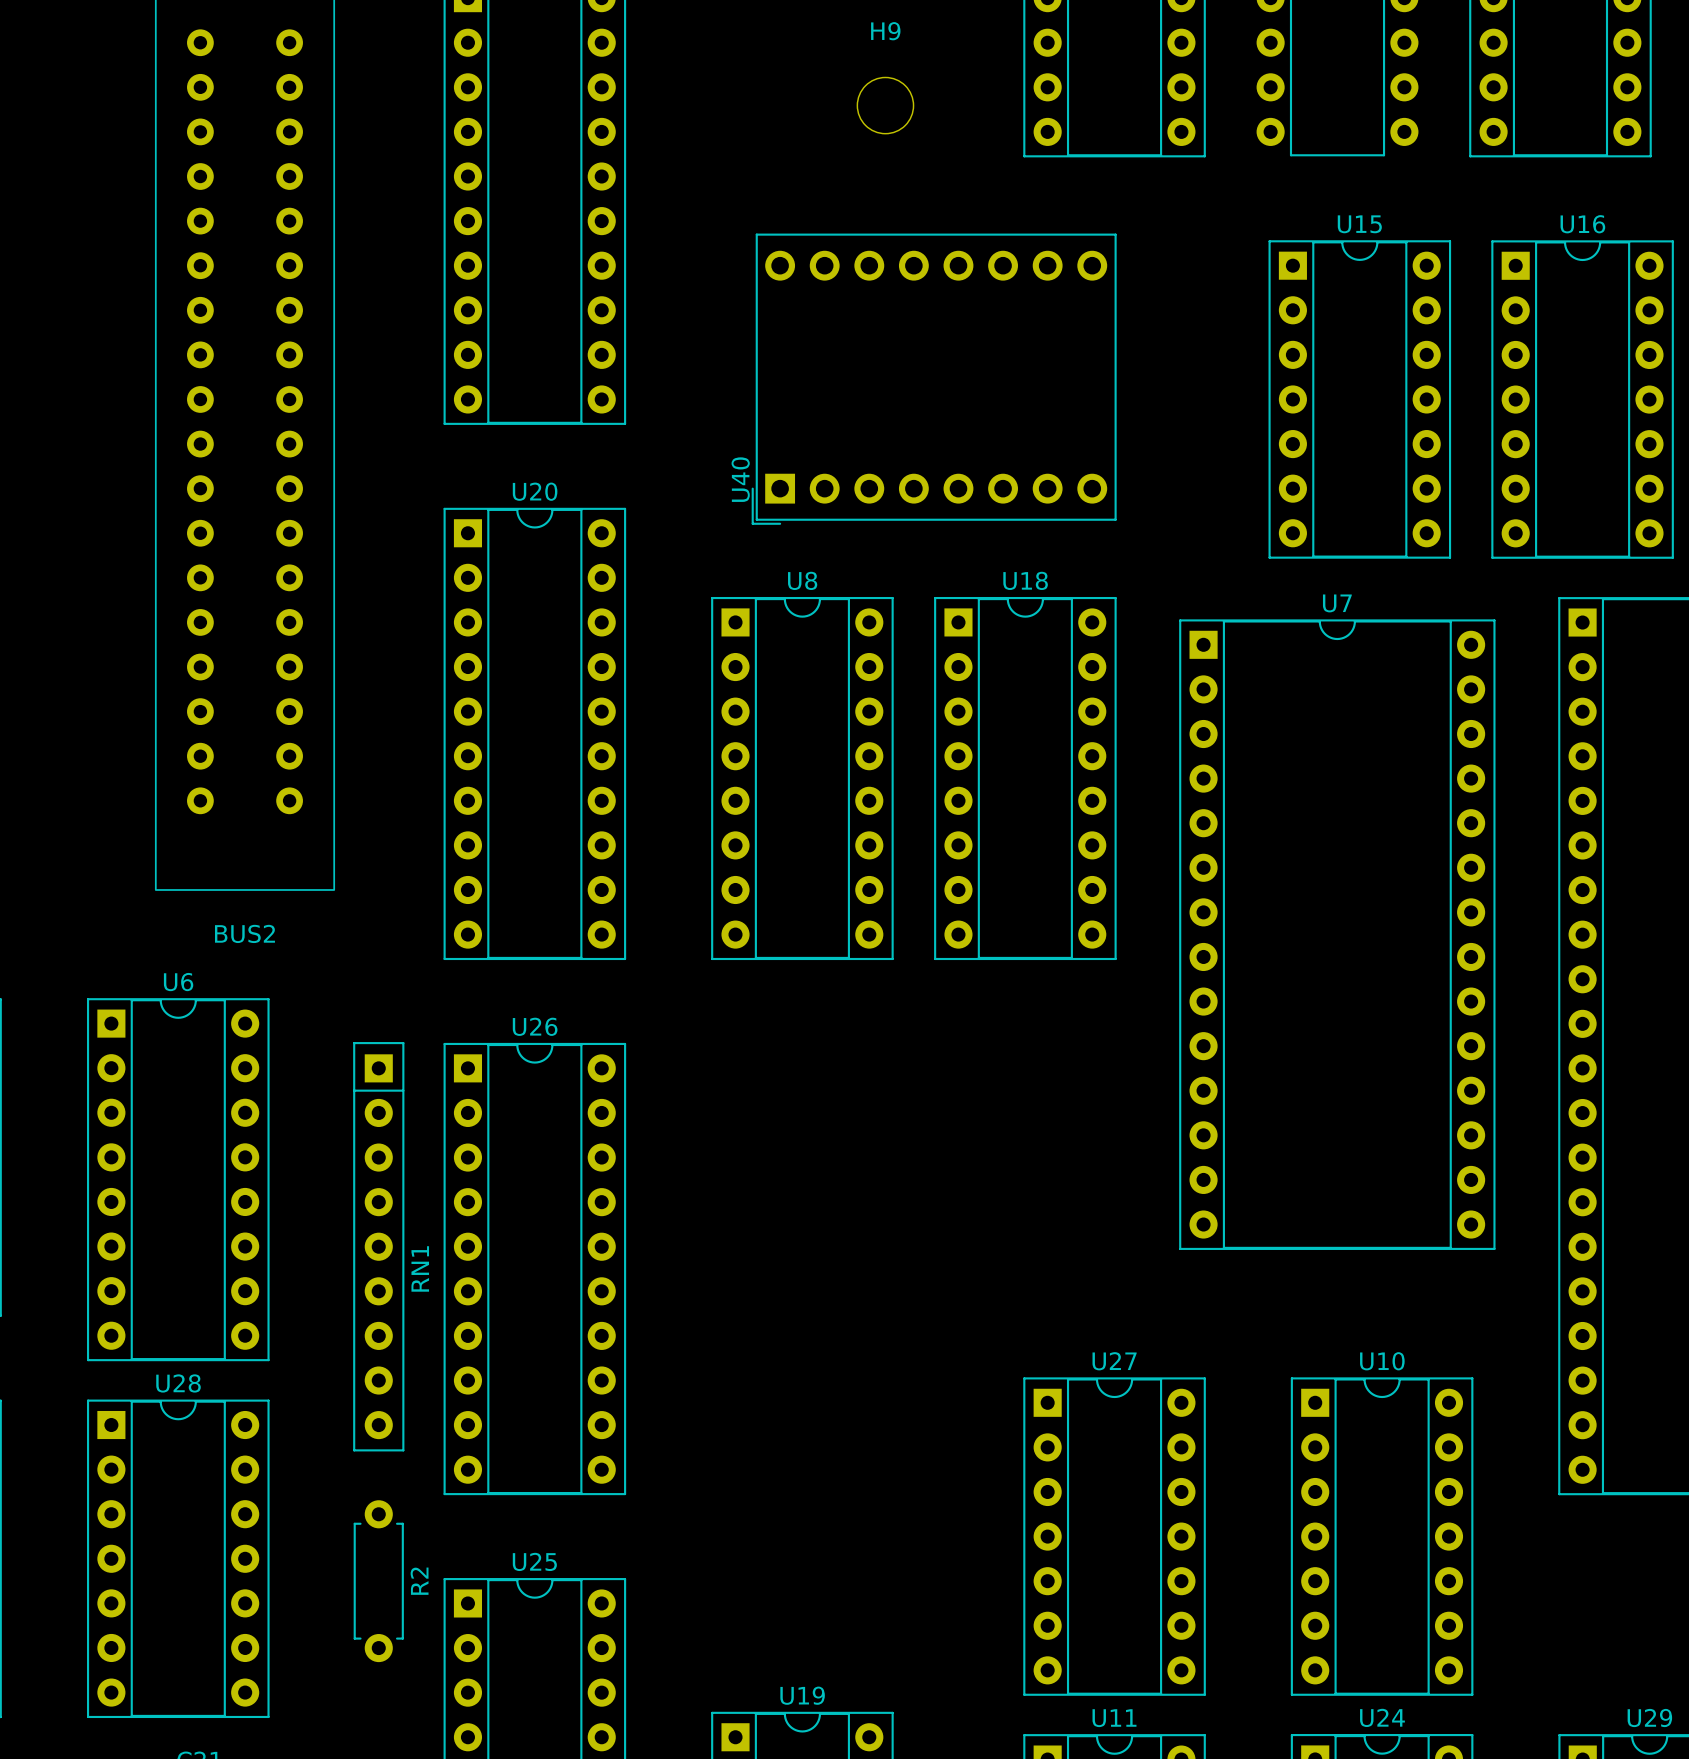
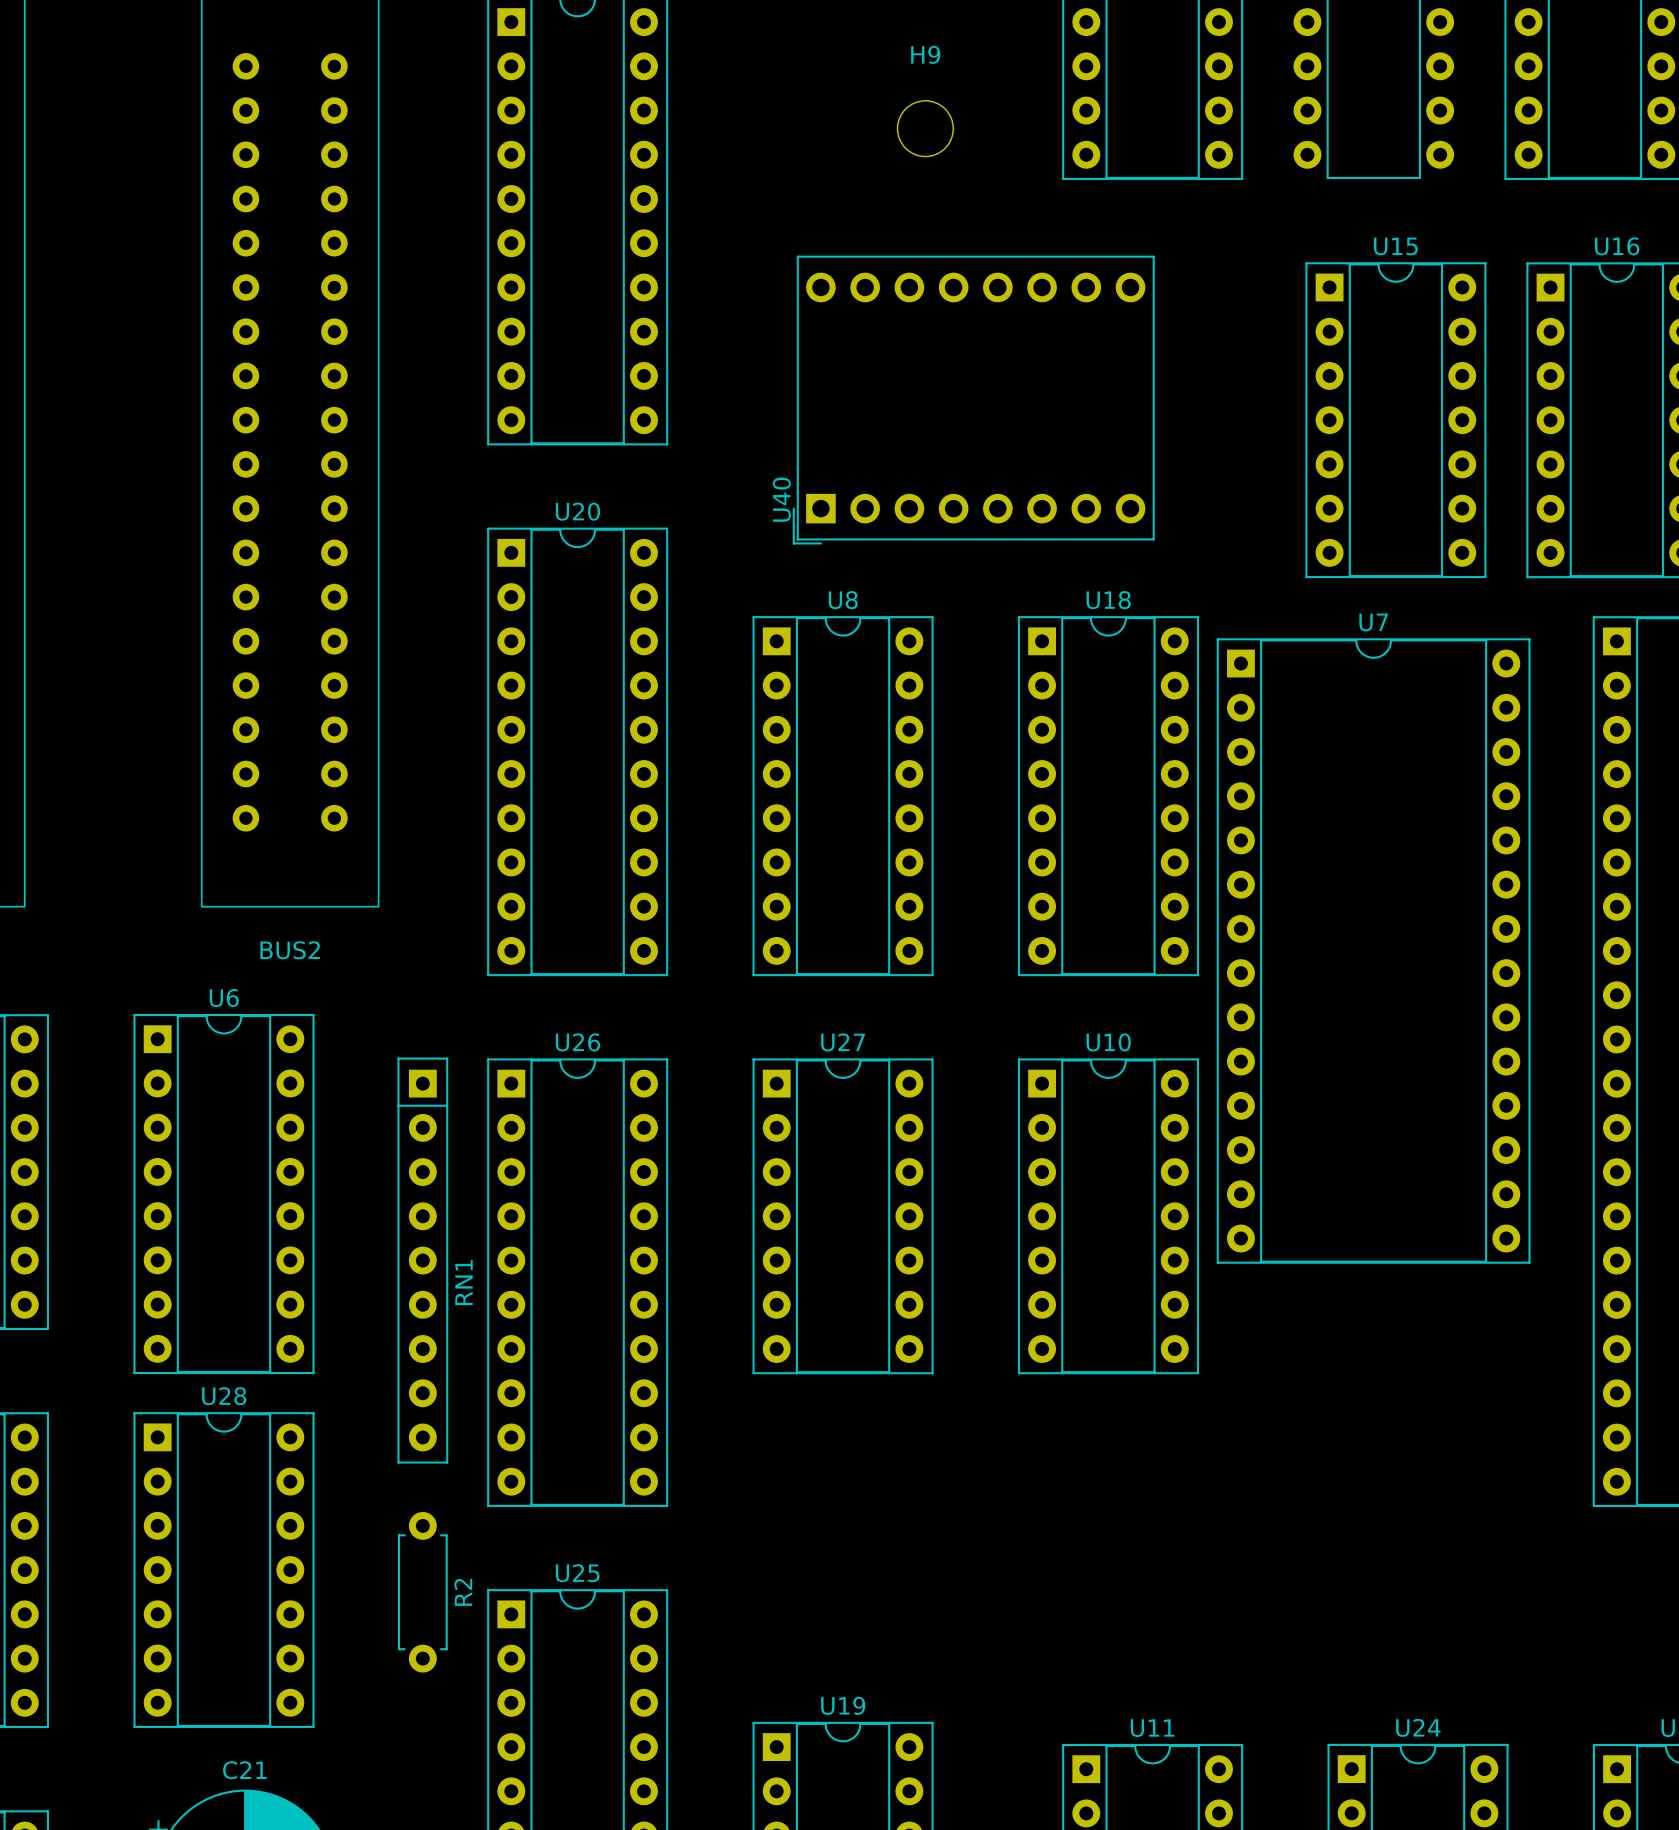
U18 position: (1025, 778) -> (1108, 796)
U27 position: (1114, 1536) -> (843, 1216)
U10 position: (1382, 1536) -> (1108, 1216)

